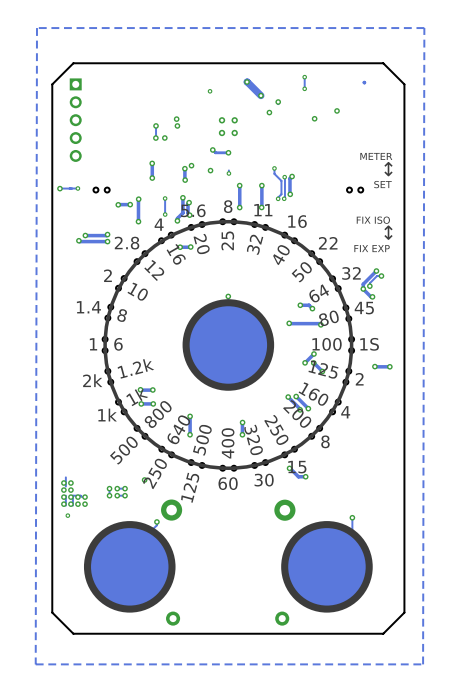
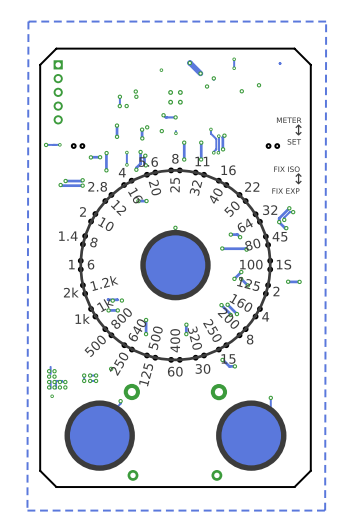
via: (180, 247) -> none
track: (190, 247) (180, 247) -> none
via: (190, 247) -> none
via: none -> (138, 201)
track: none -> (146, 201) (138, 201)
via: none -> (146, 201)
via: (140, 389) -> none
via: (152, 389) -> none
via: none -> (112, 300)
via: none -> (121, 300)

